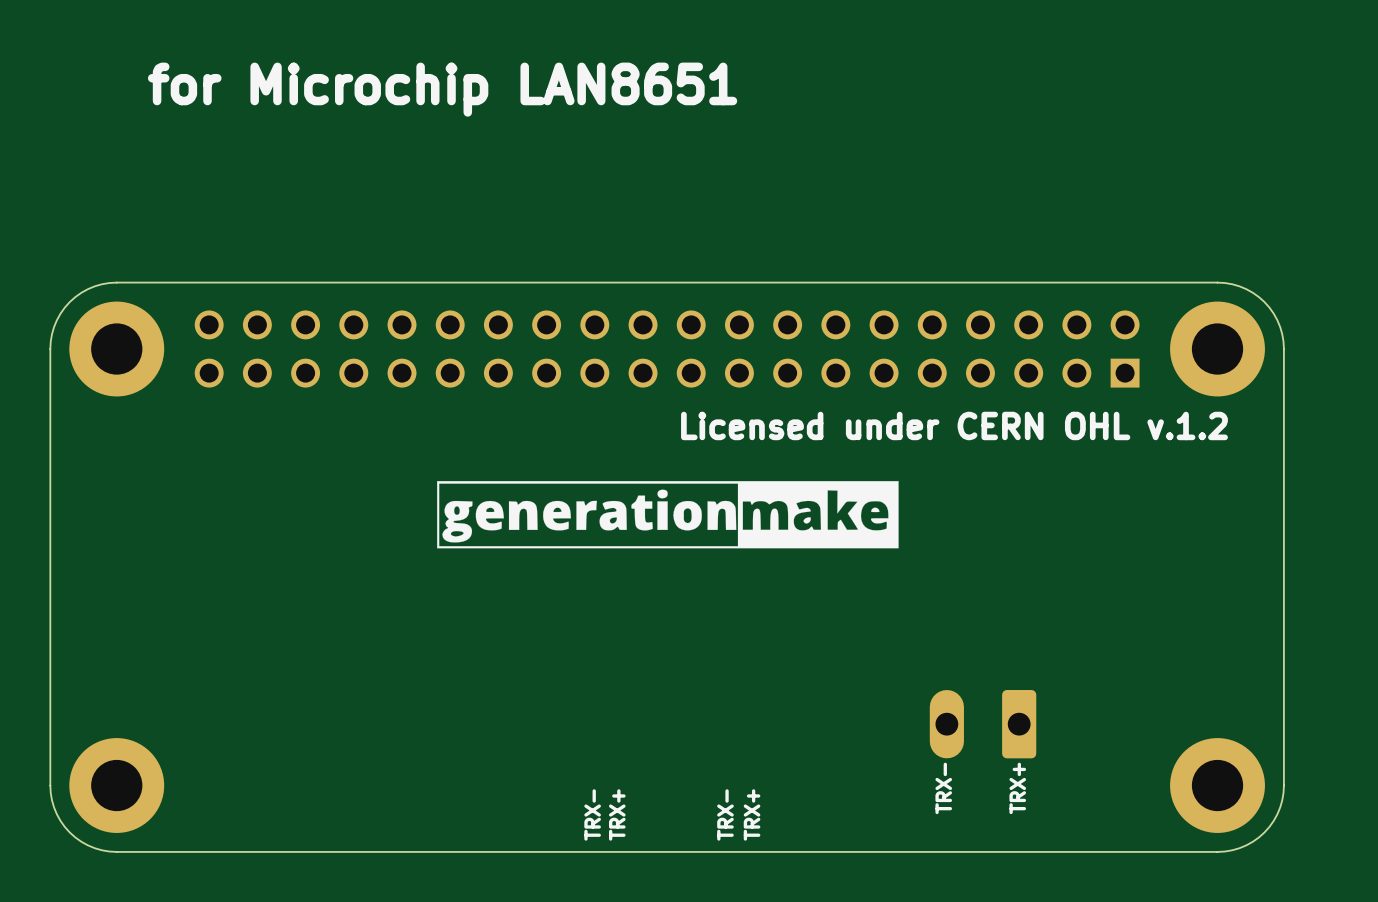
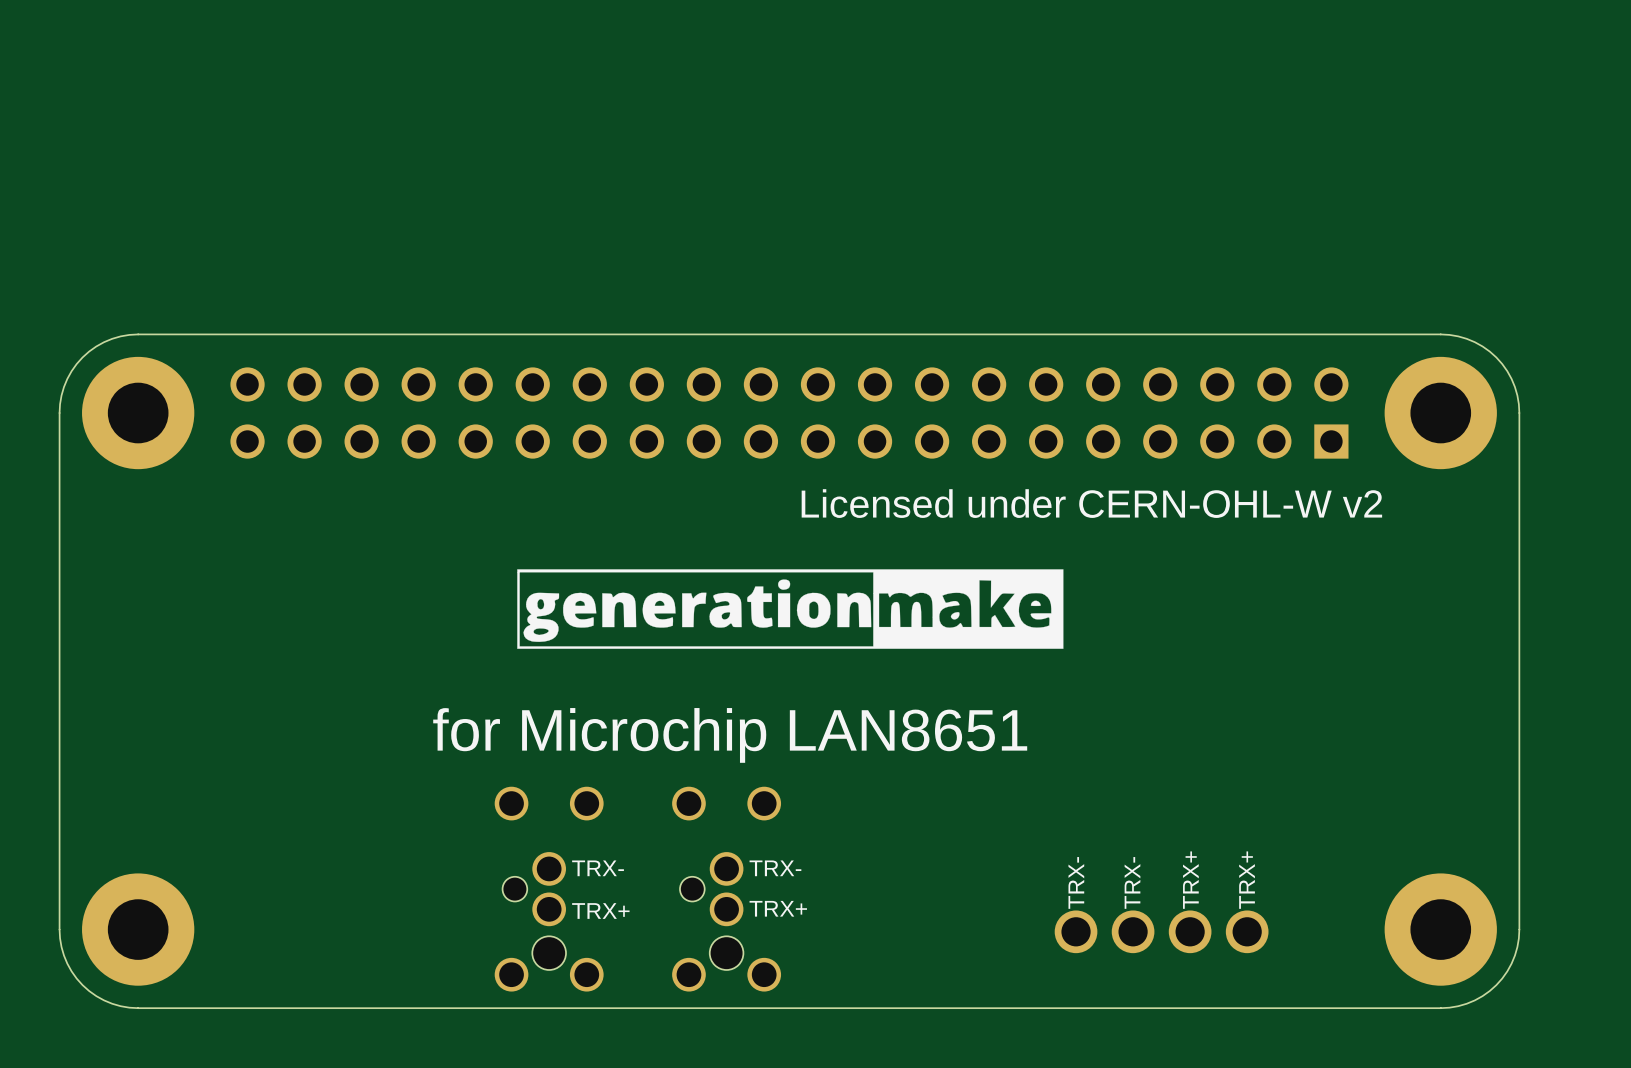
text: for Microchip LAN8651 (442, 89) -> none
text: Licensed under CERN OHL v.1.2 (954, 425) -> Licensed under CERN-OHL-W v2 (1091, 503)
text: none -> for Microchip LAN8651 (730, 735)
part: (983, 724) -> none
text: none -> TRX- (598, 868)
text: none -> TRX- (775, 868)
text: none -> TRX- (1076, 882)
text: none -> TRX+ (1247, 880)
part: none -> (549, 889)
part: none -> (726, 889)
text: none -> TRX+ (778, 908)
text: none -> TRX+ (600, 911)
part: none -> (1161, 931)
text position: TRX- (943, 788) -> TRX- (1132, 882)
text position: TRX+ (1017, 788) -> TRX+ (1190, 880)
text: TRX- (592, 814) -> none
text: TRX+ (617, 814) -> none
text: TRX- (725, 814) -> none
text: TRX+ (752, 814) -> none

